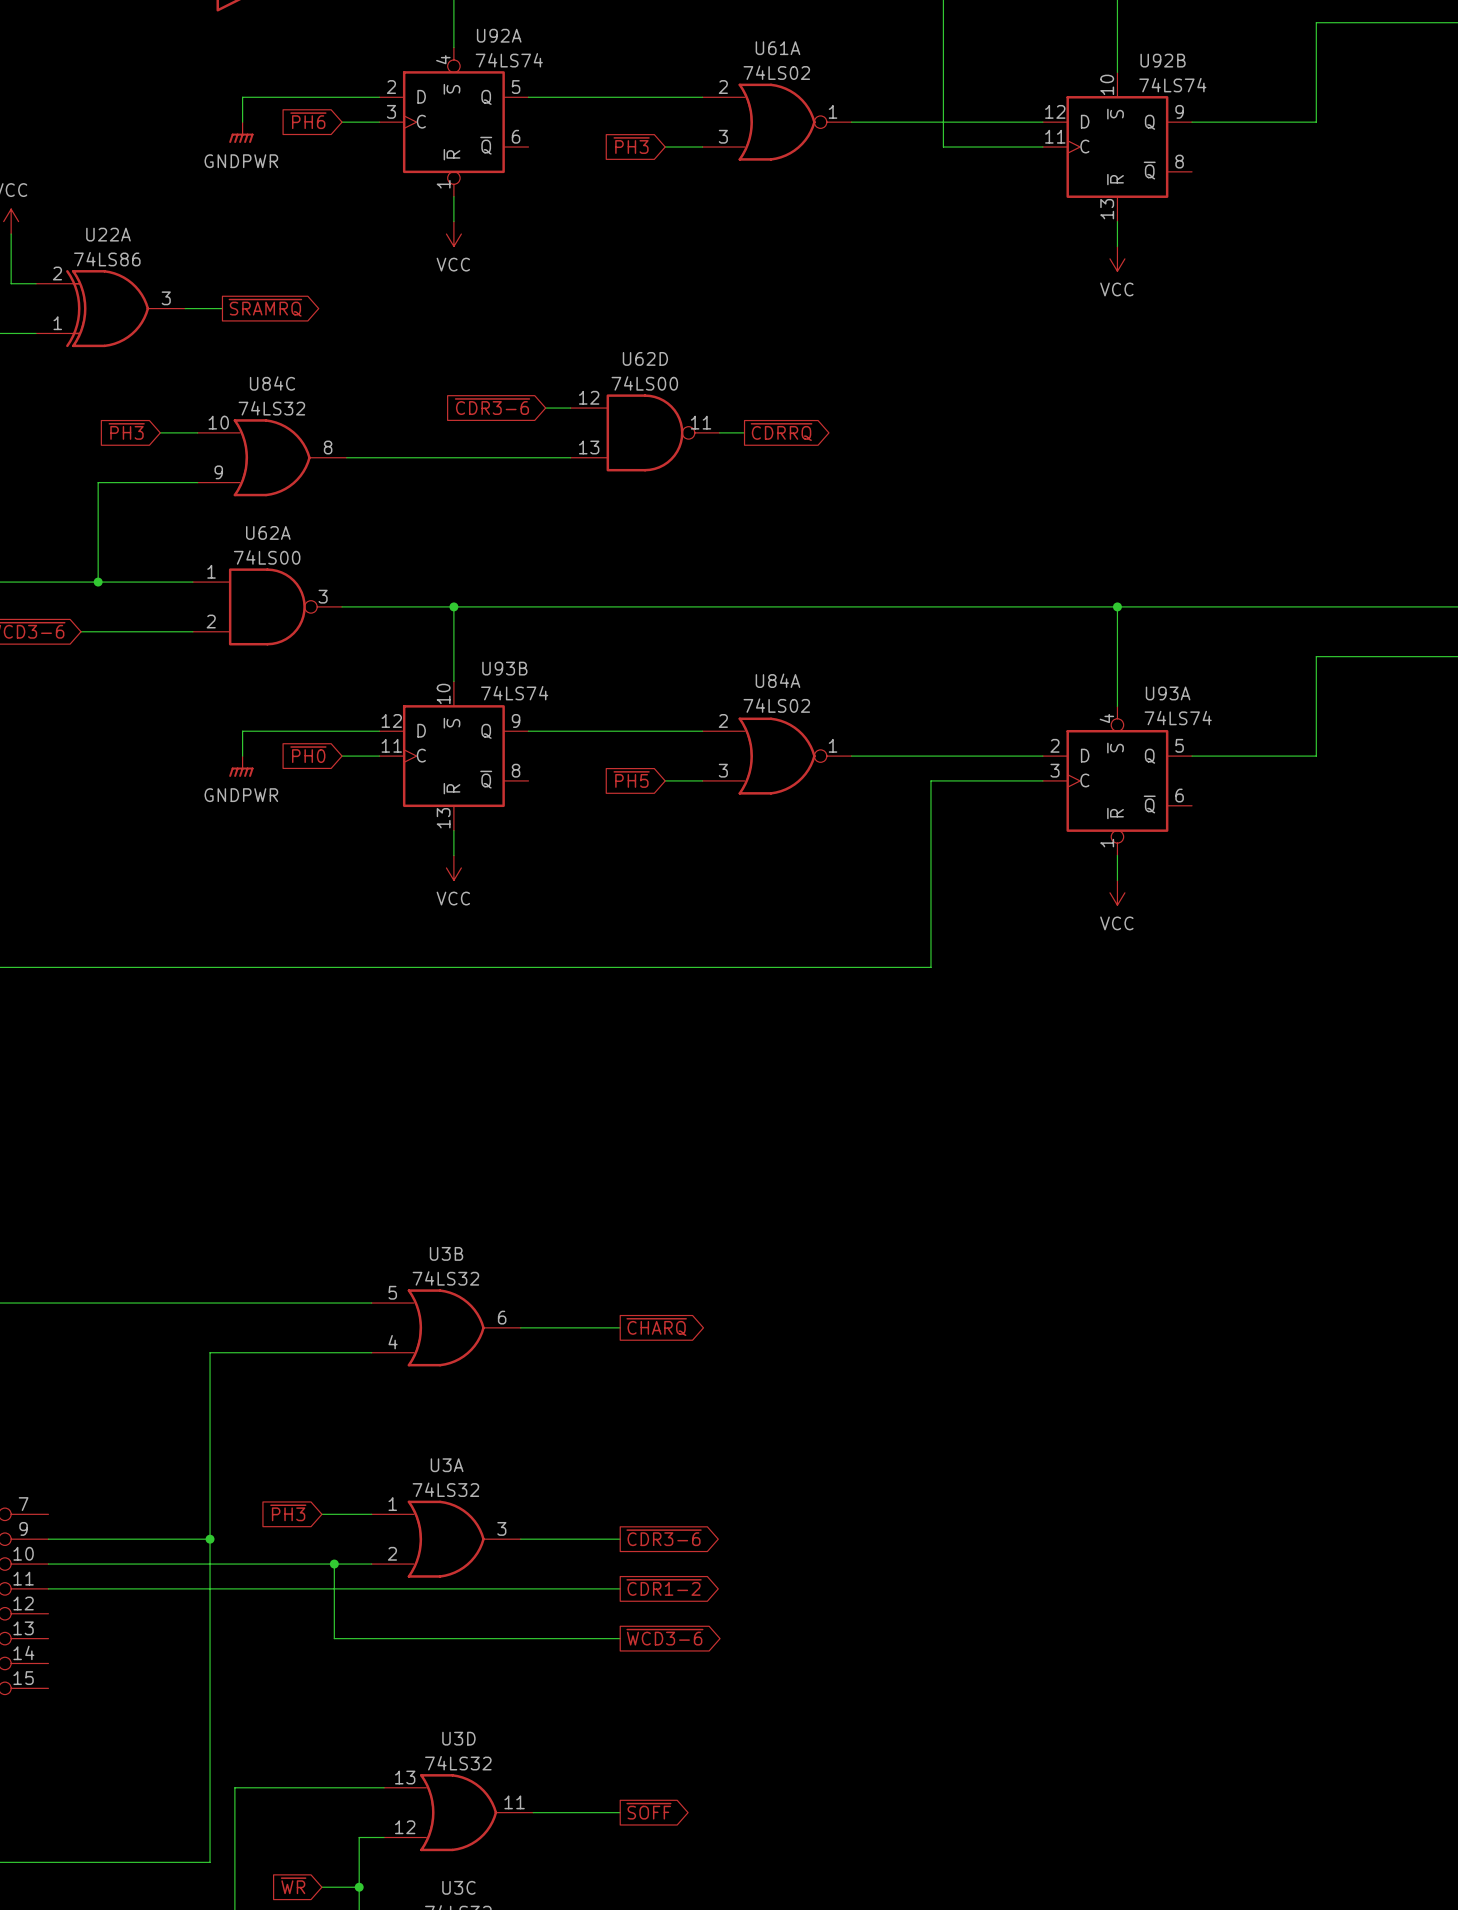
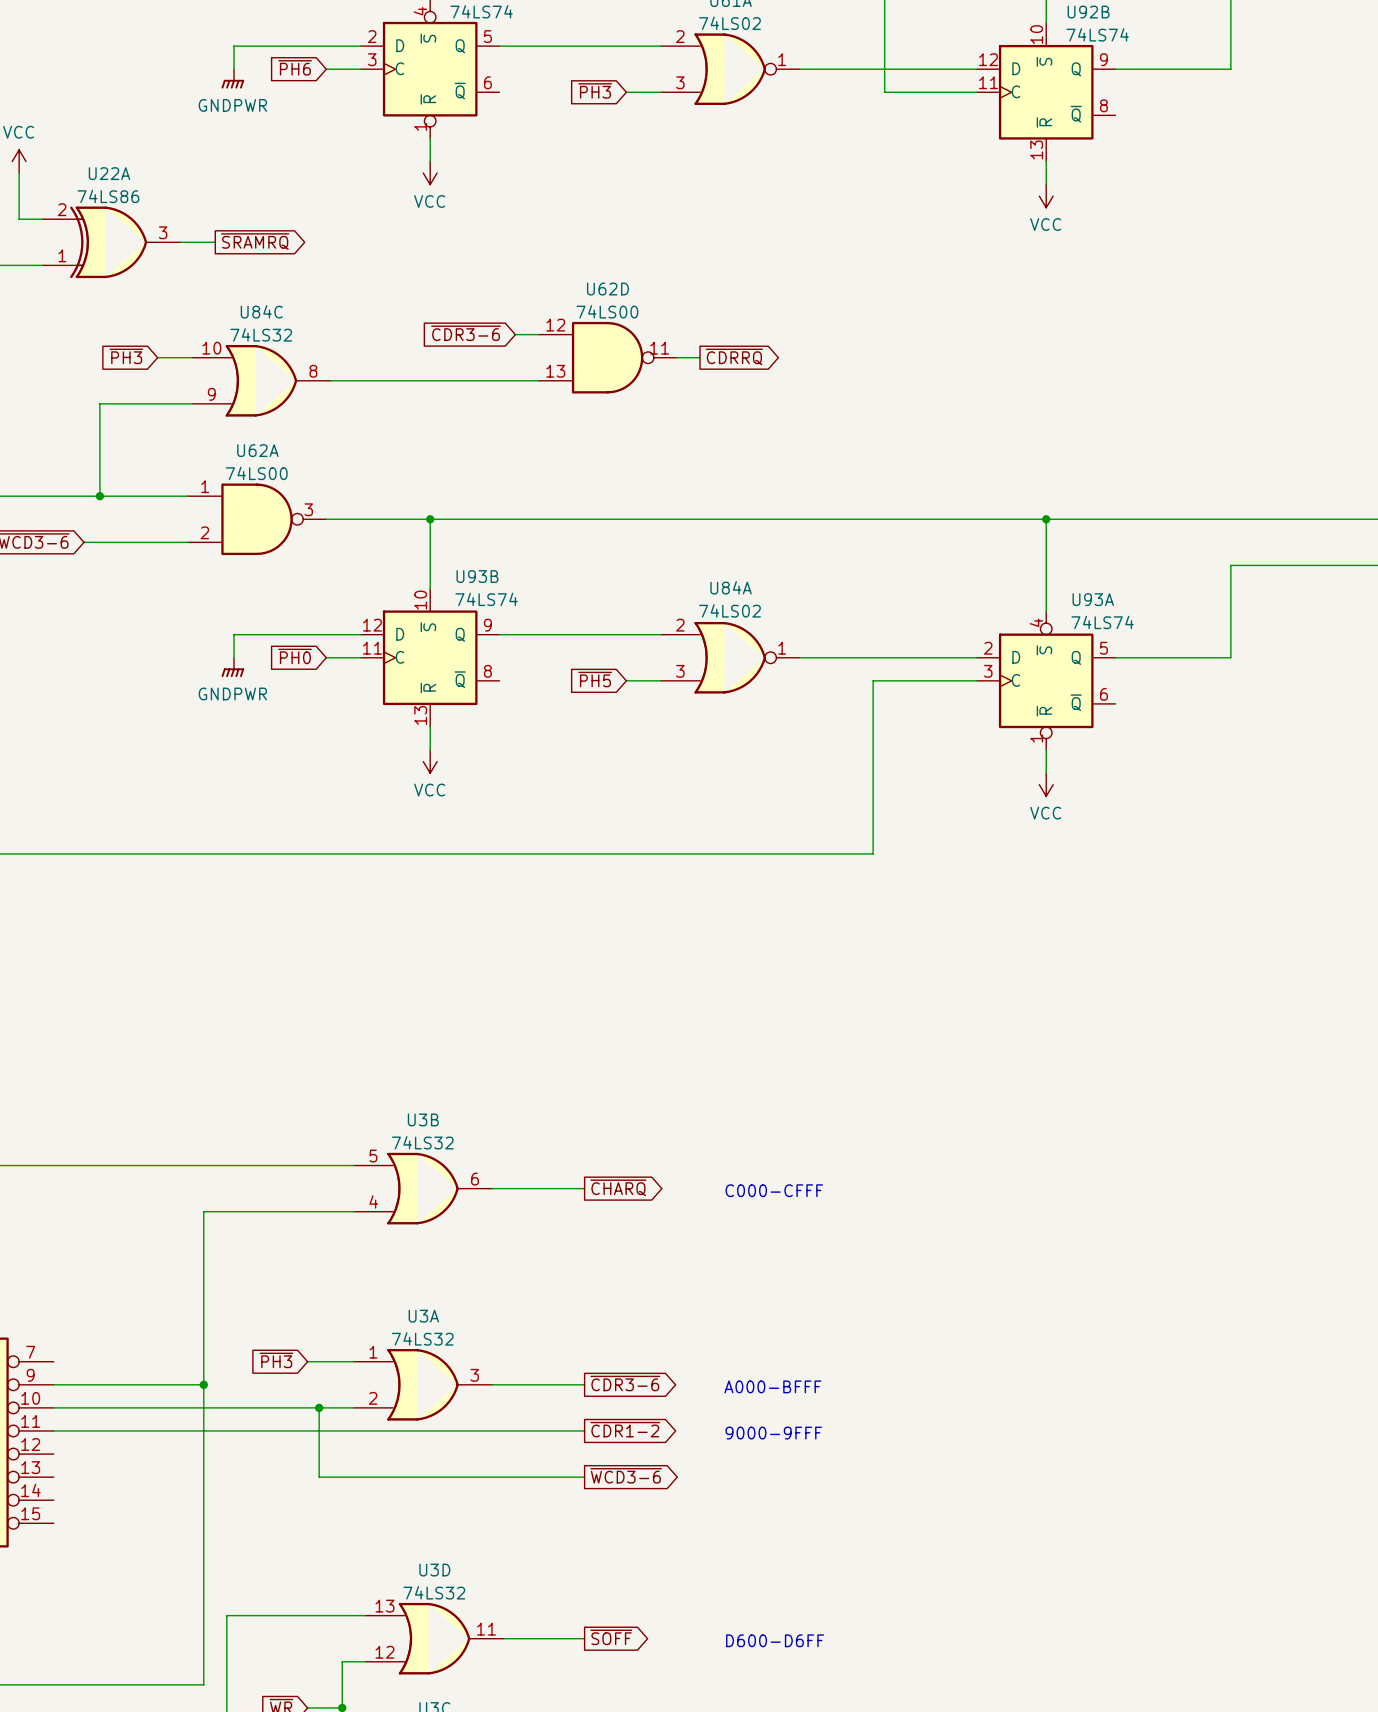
text: none -> C000-CFFF (774, 1190)
text: none -> A000-BFFF (772, 1386)
text: none -> 9000-9FFF (773, 1433)
text: none -> D600-D6FF (775, 1640)

